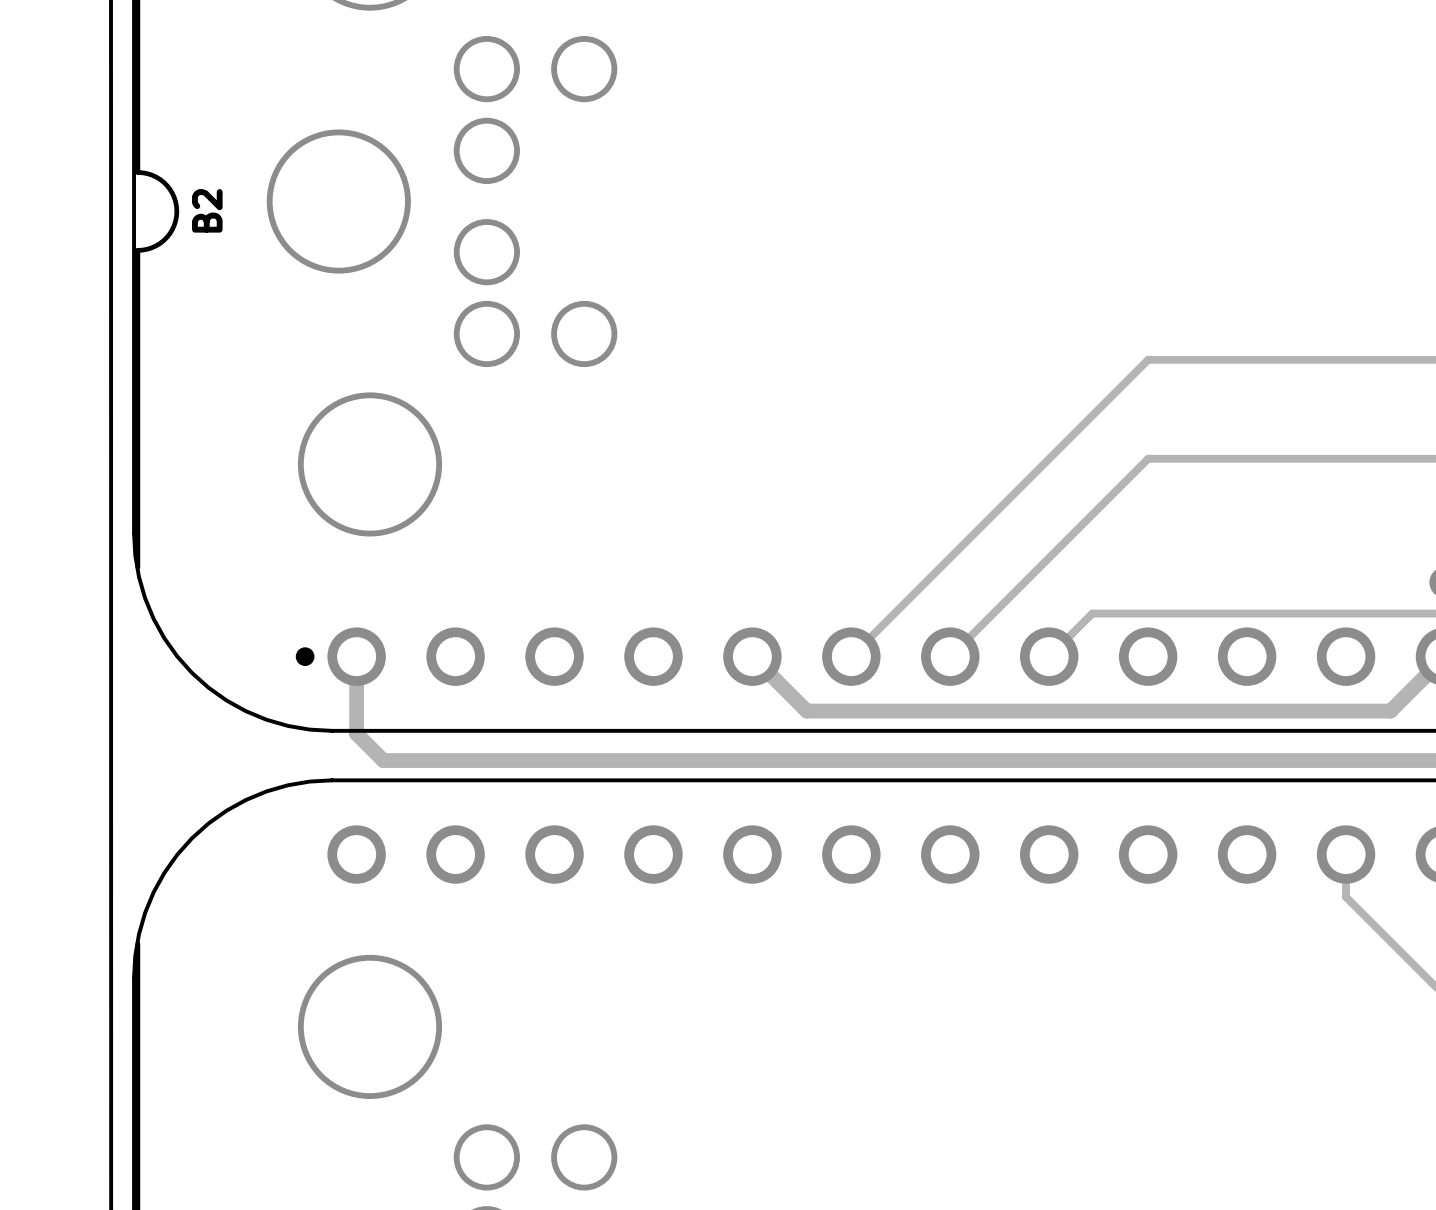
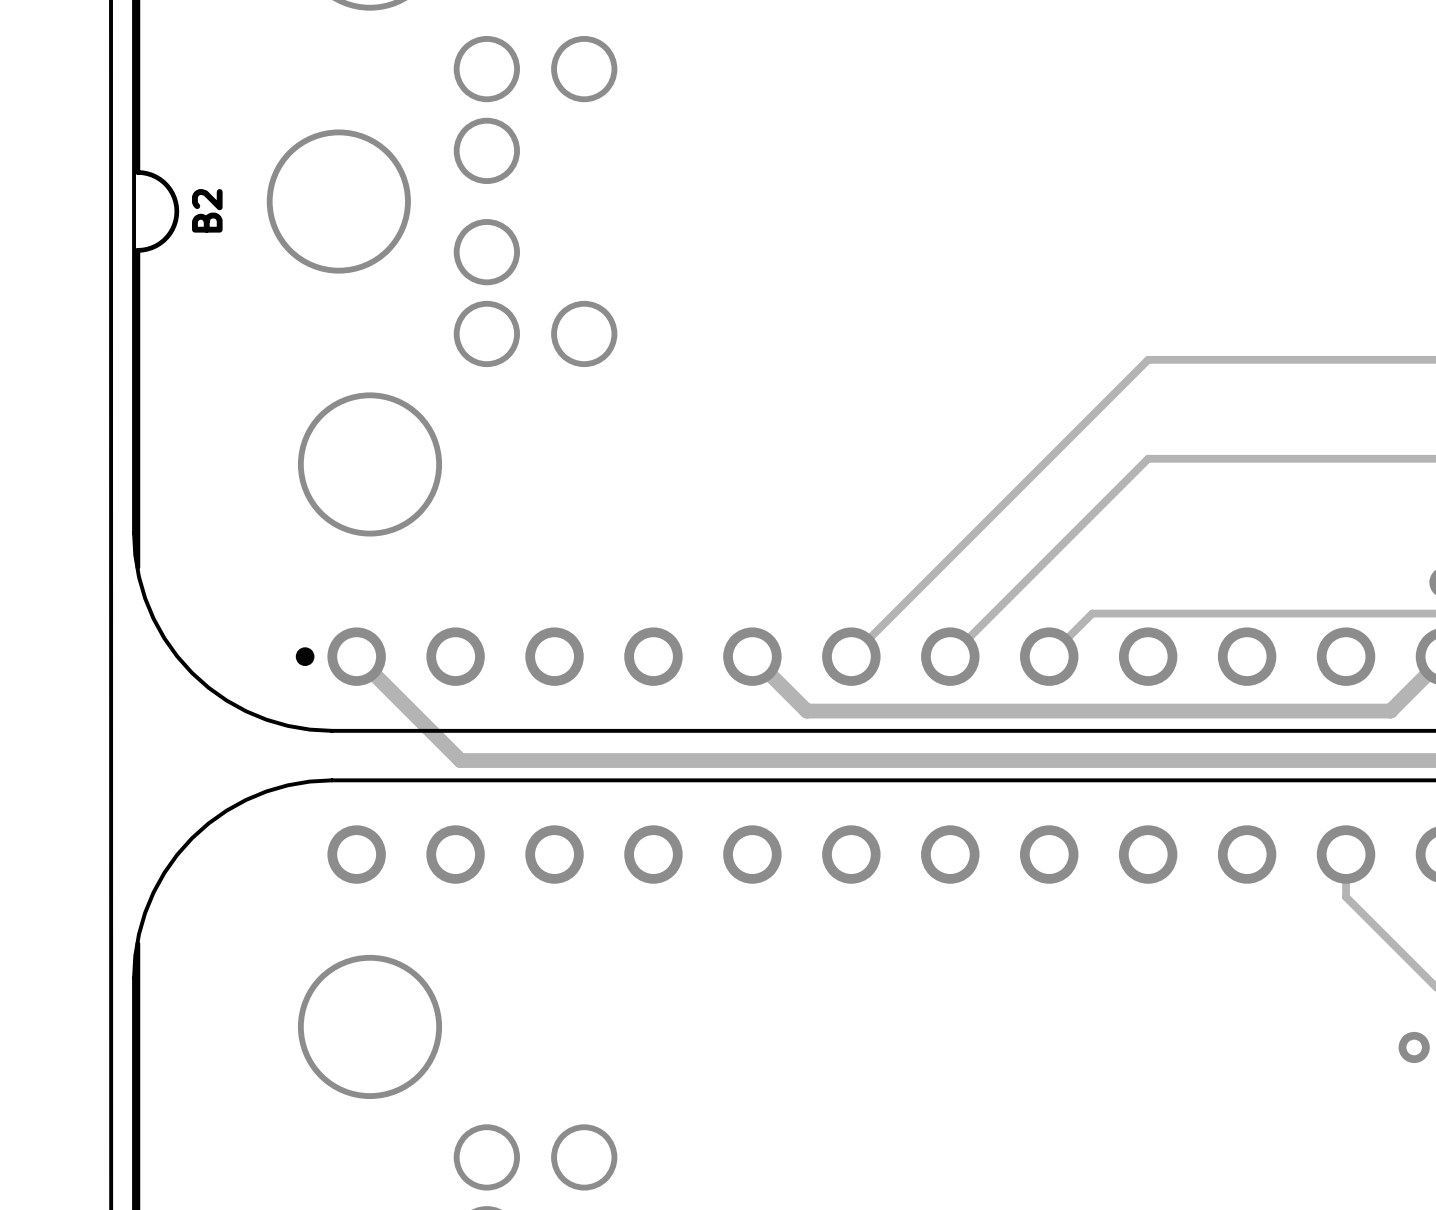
track: (356, 656) (356, 733) (383, 760) (460, 760) -> (356, 656) (460, 760)
via: none -> (1414, 1047)

